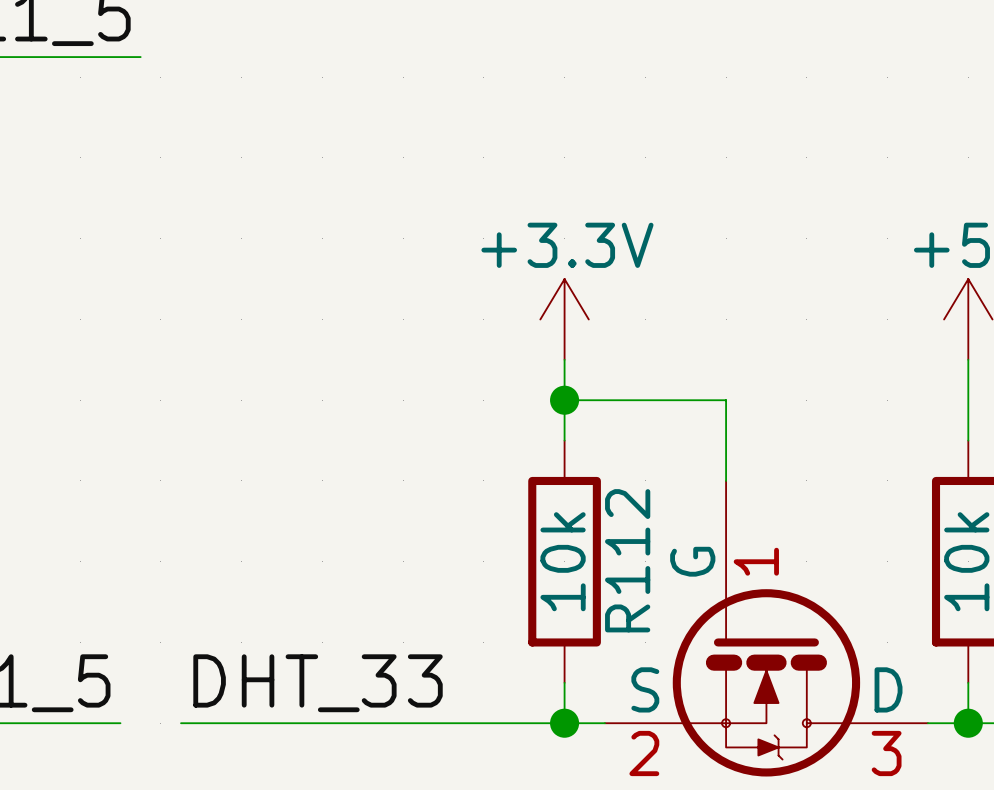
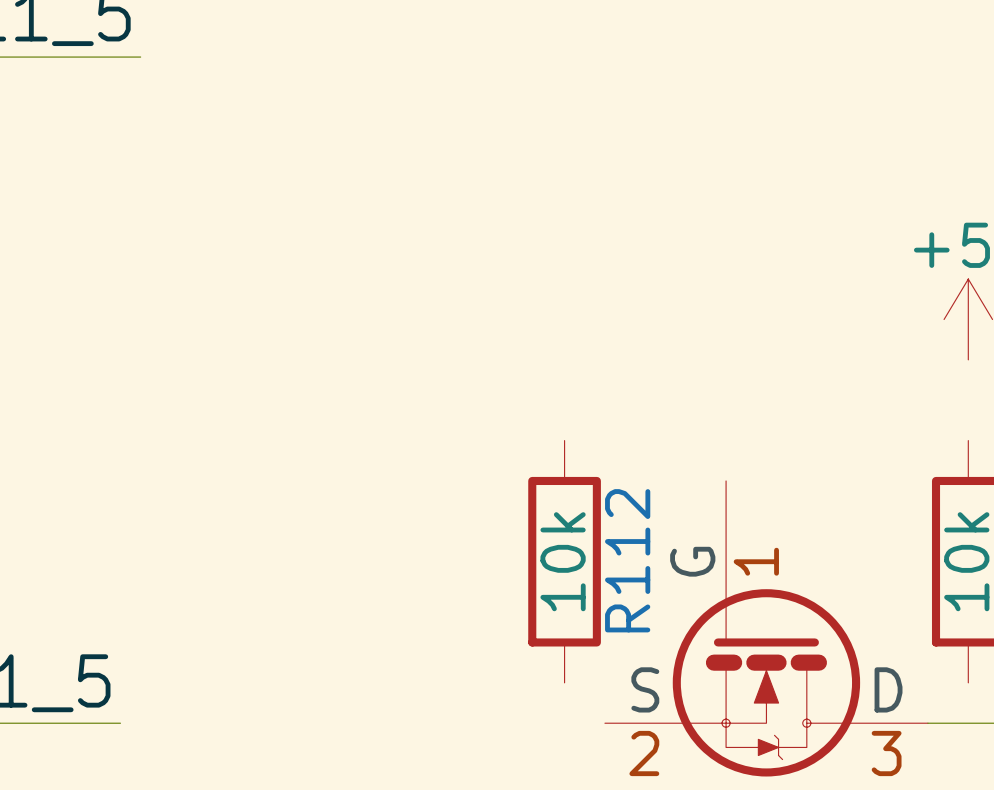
power symbol: +3.3V (564, 319) -> none
wire: (564, 359) (564, 440) -> none
wire: (968, 359) (968, 440) -> none
wire: (564, 400) (726, 400) (726, 480) -> none
junction: (564, 400) -> none
wire: (564, 682) (564, 723) -> none
wire: (968, 682) (968, 723) -> none
label: DHT_33 (318, 683) -> none
wire: (181, 723) (604, 723) -> none
junction: (564, 723) -> none
junction: (968, 723) -> none

